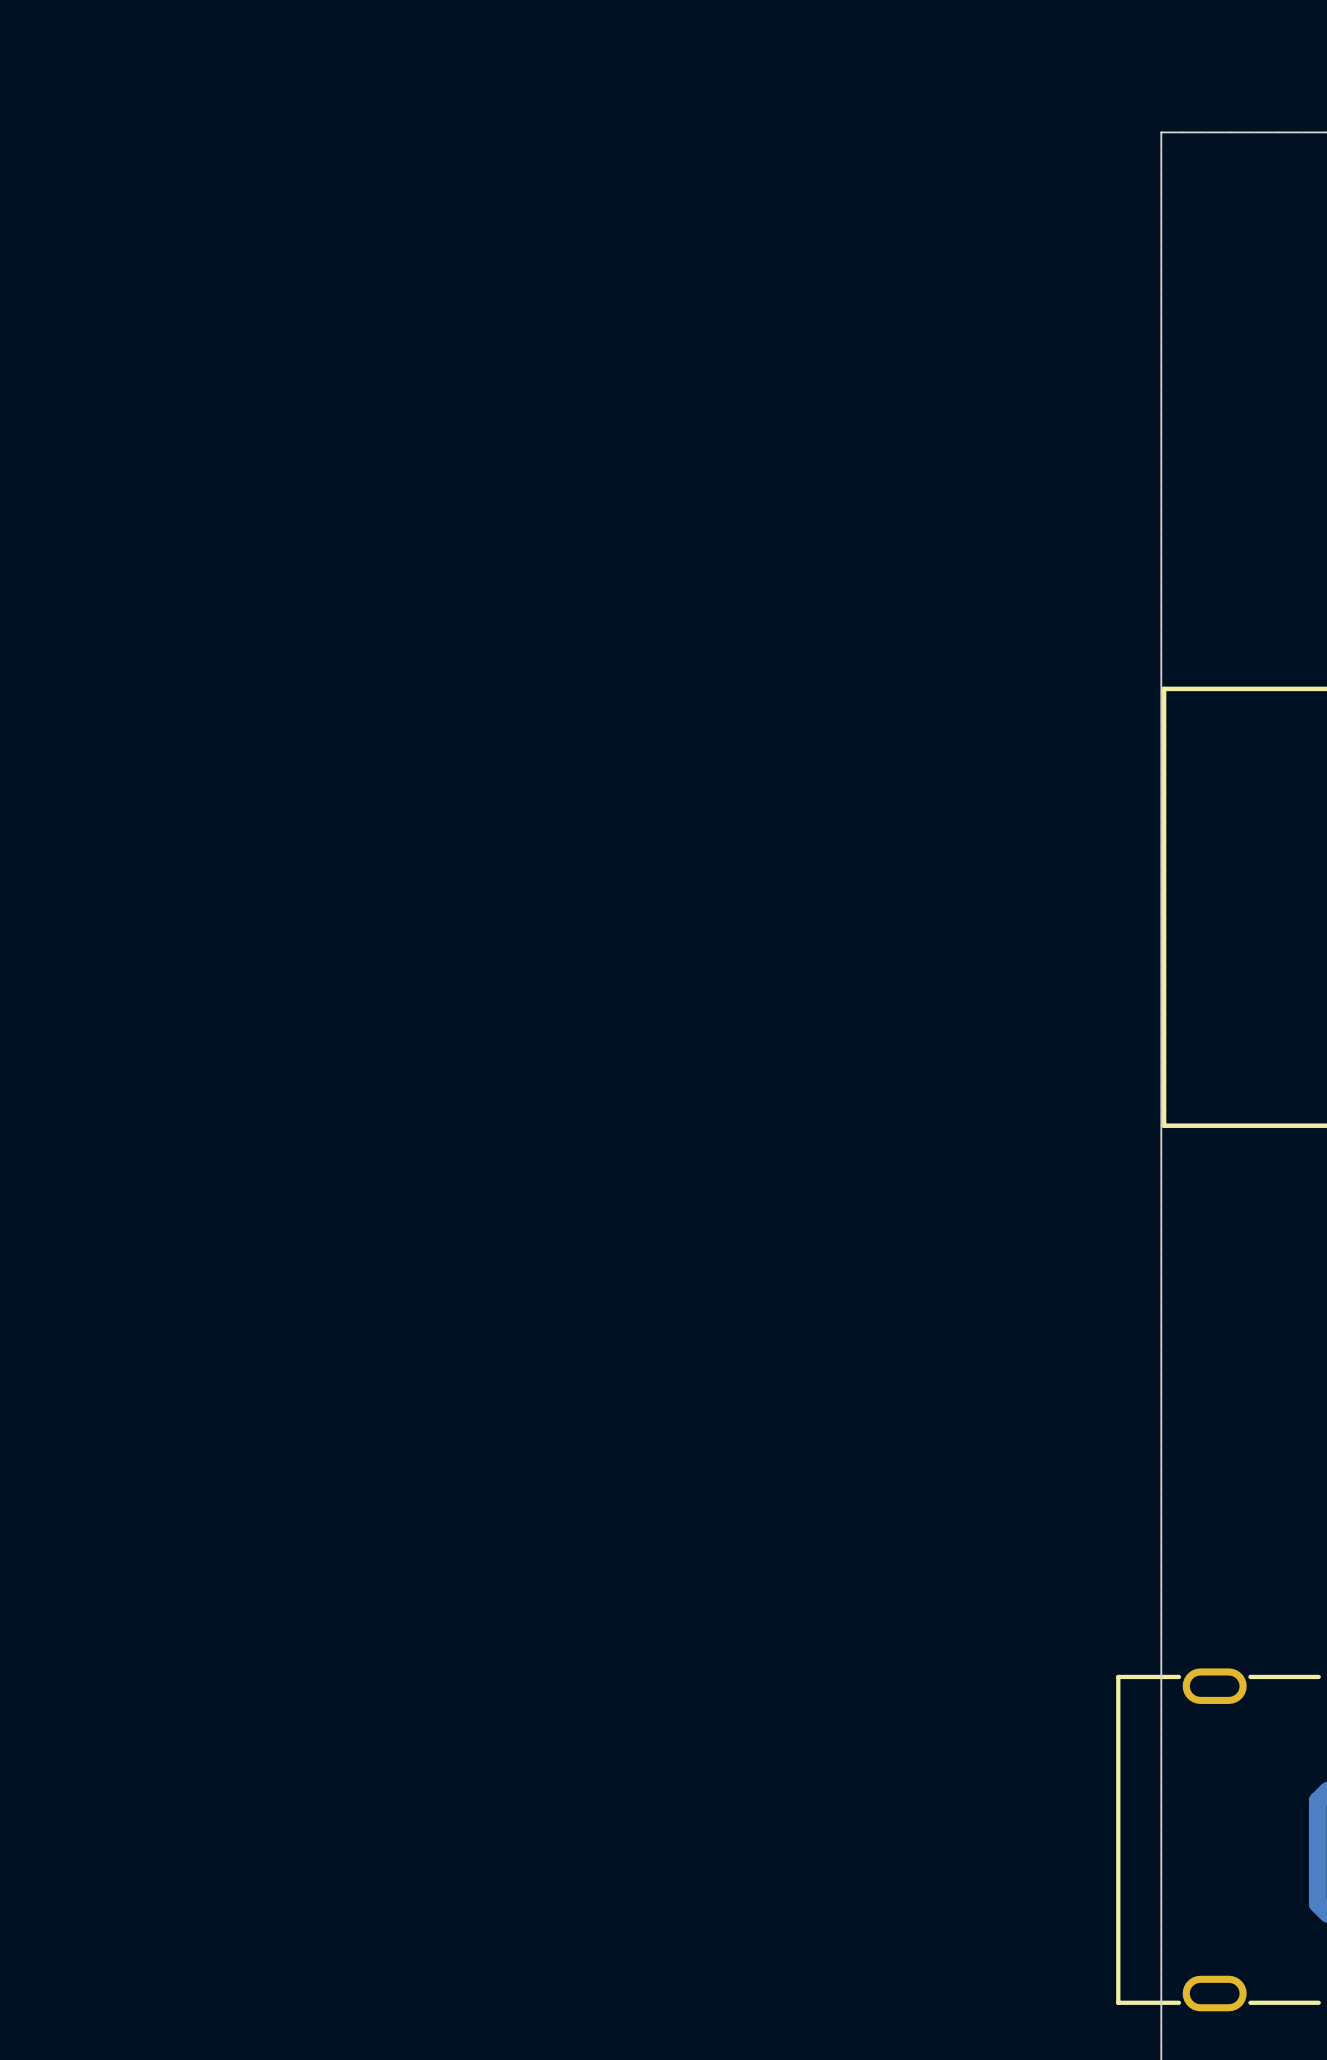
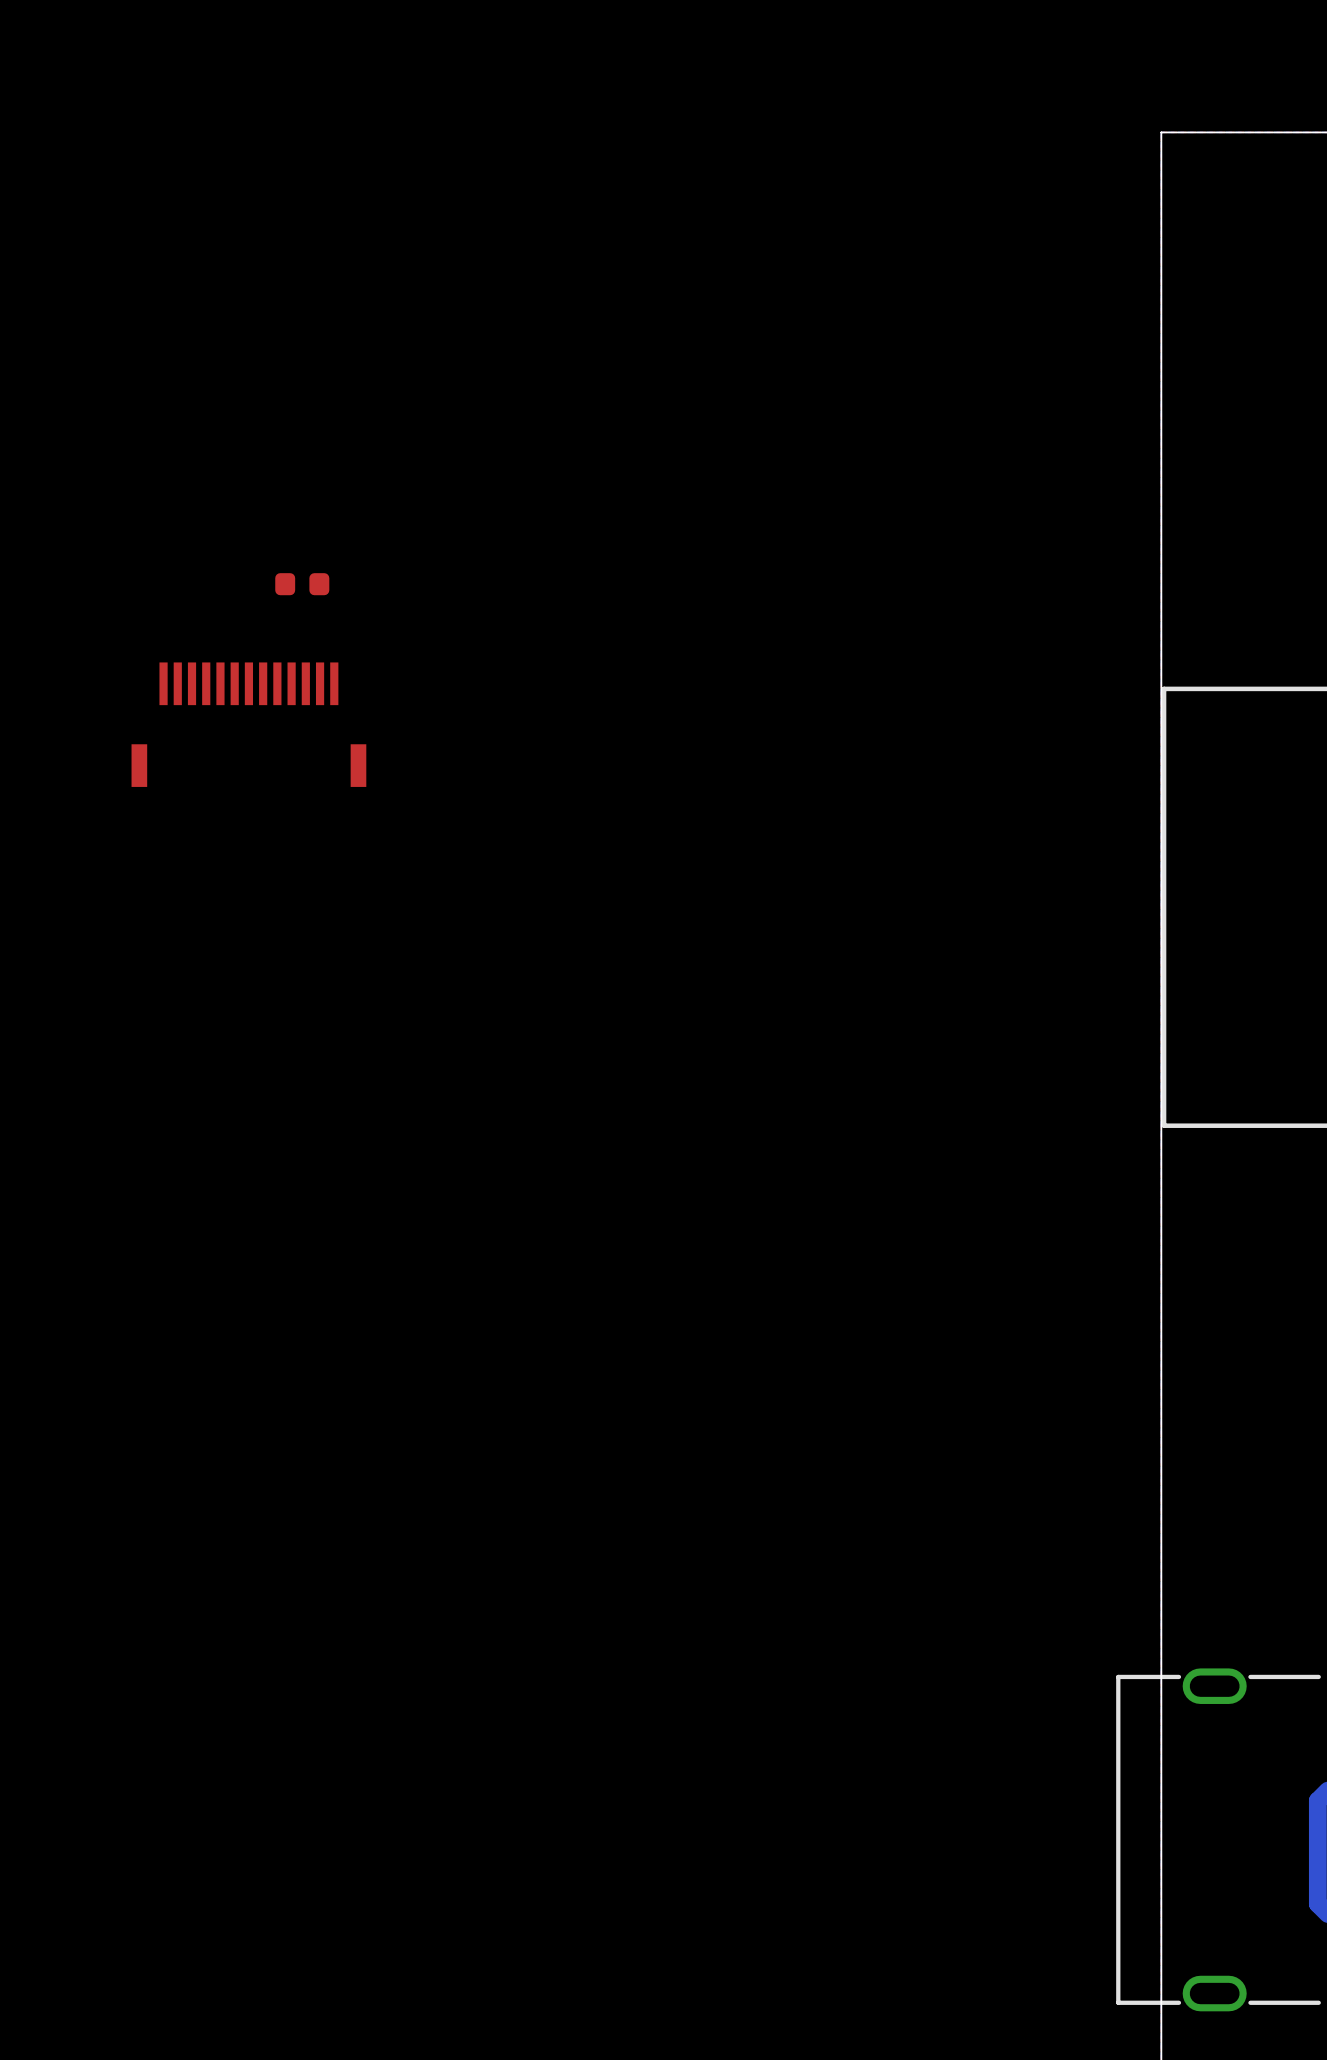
part: none -> (302, 584)
part: none -> (248, 724)

